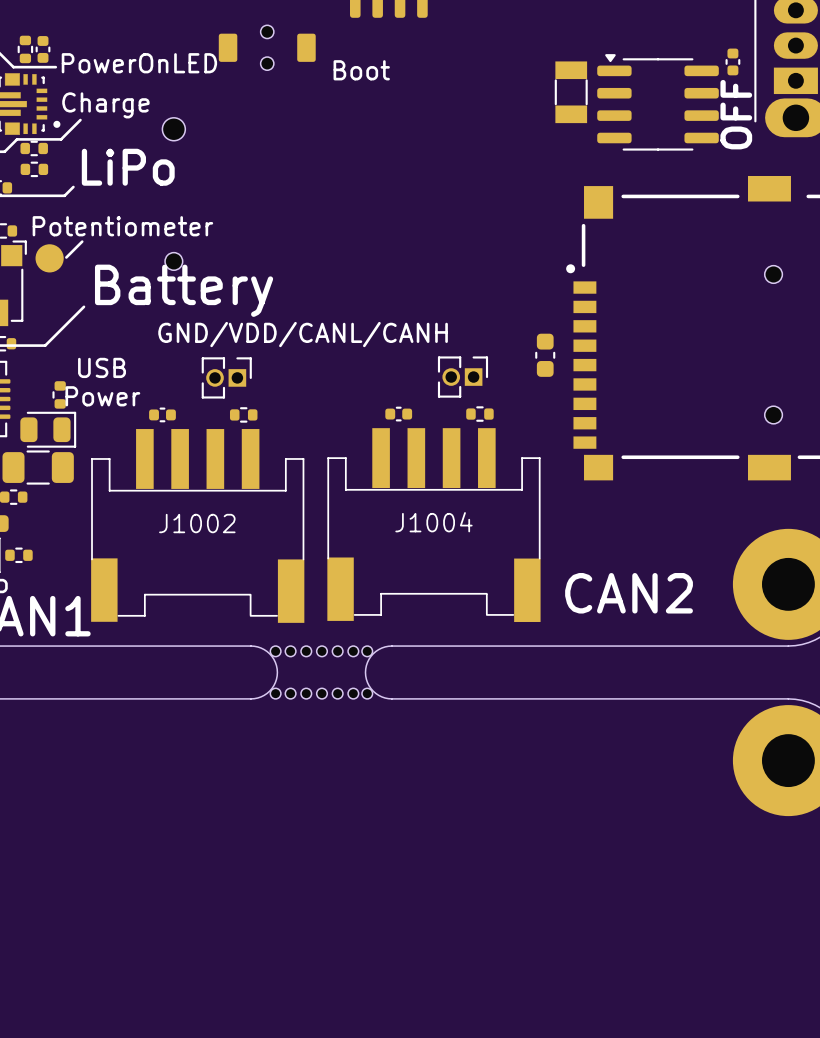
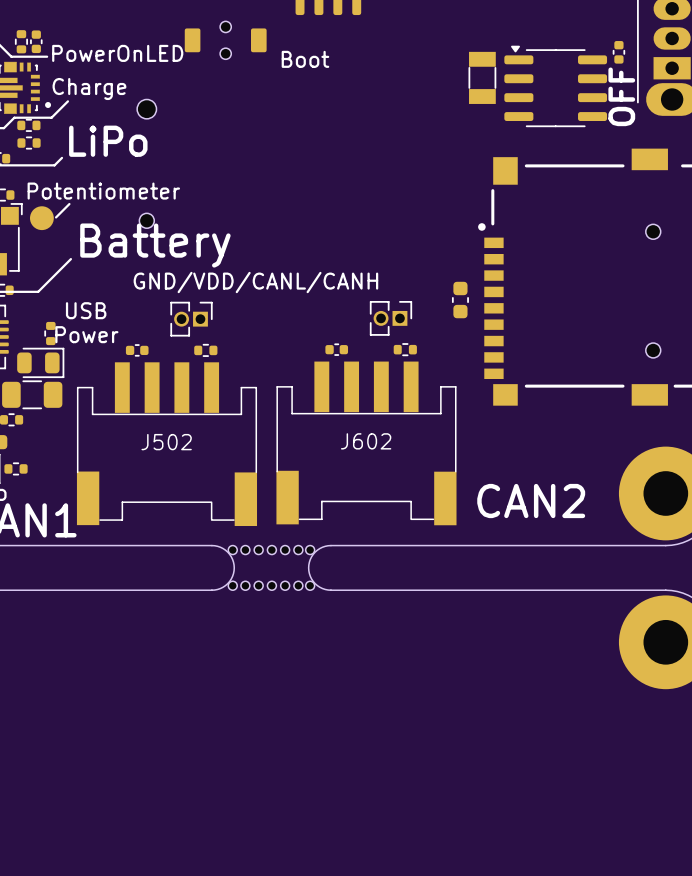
J1004 name: J1004 (433, 522) -> J602 (366, 441)
J1002 name: J1002 (197, 523) -> J502 (166, 442)

